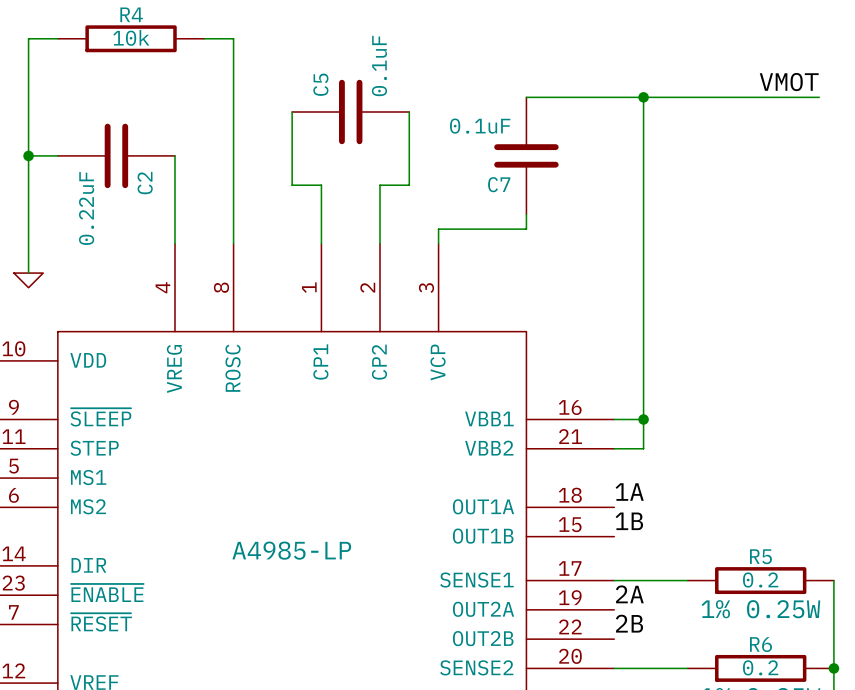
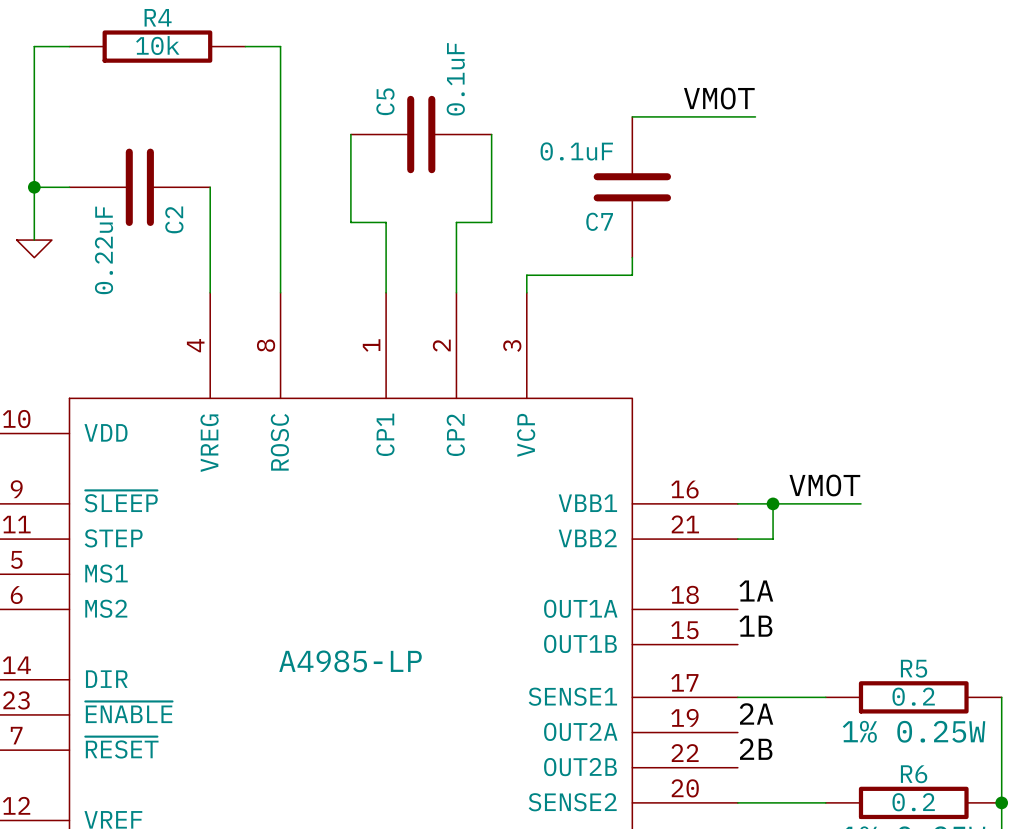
label: none -> VMOT (719, 98)
label: VMOT (789, 82) -> none
wire: (628, 97) (819, 97) -> none
wire: (643, 97) (643, 419) -> (860, 503) (773, 503)
junction: (643, 97) -> none
wire: (28, 199) (28, 273) -> none
power symbol position: (28, 280) -> (34, 248)
label: none -> VMOT (824, 485)

